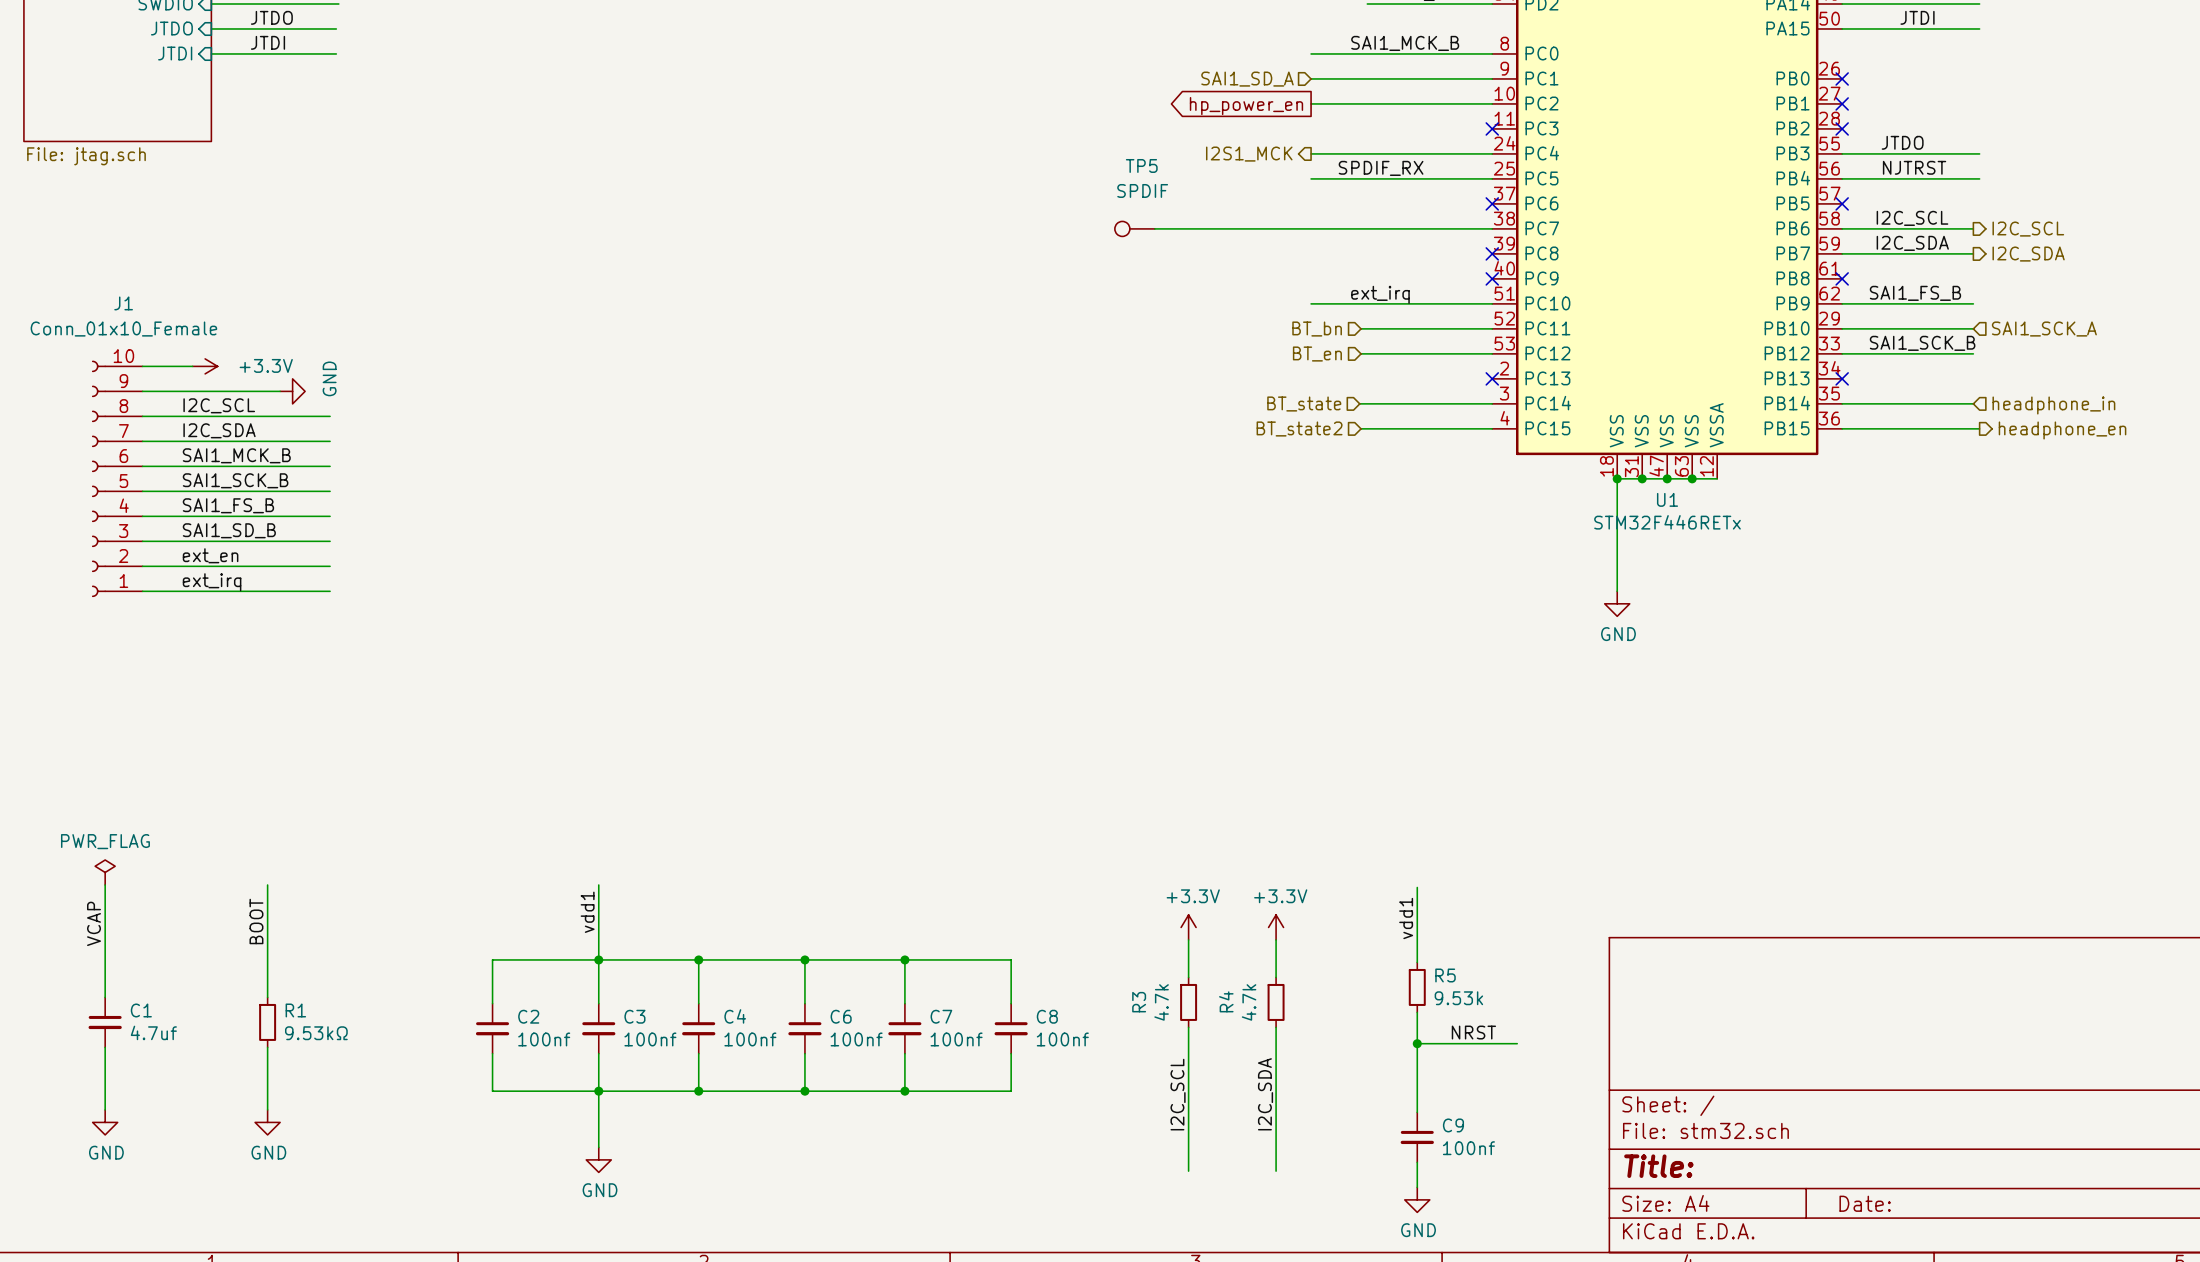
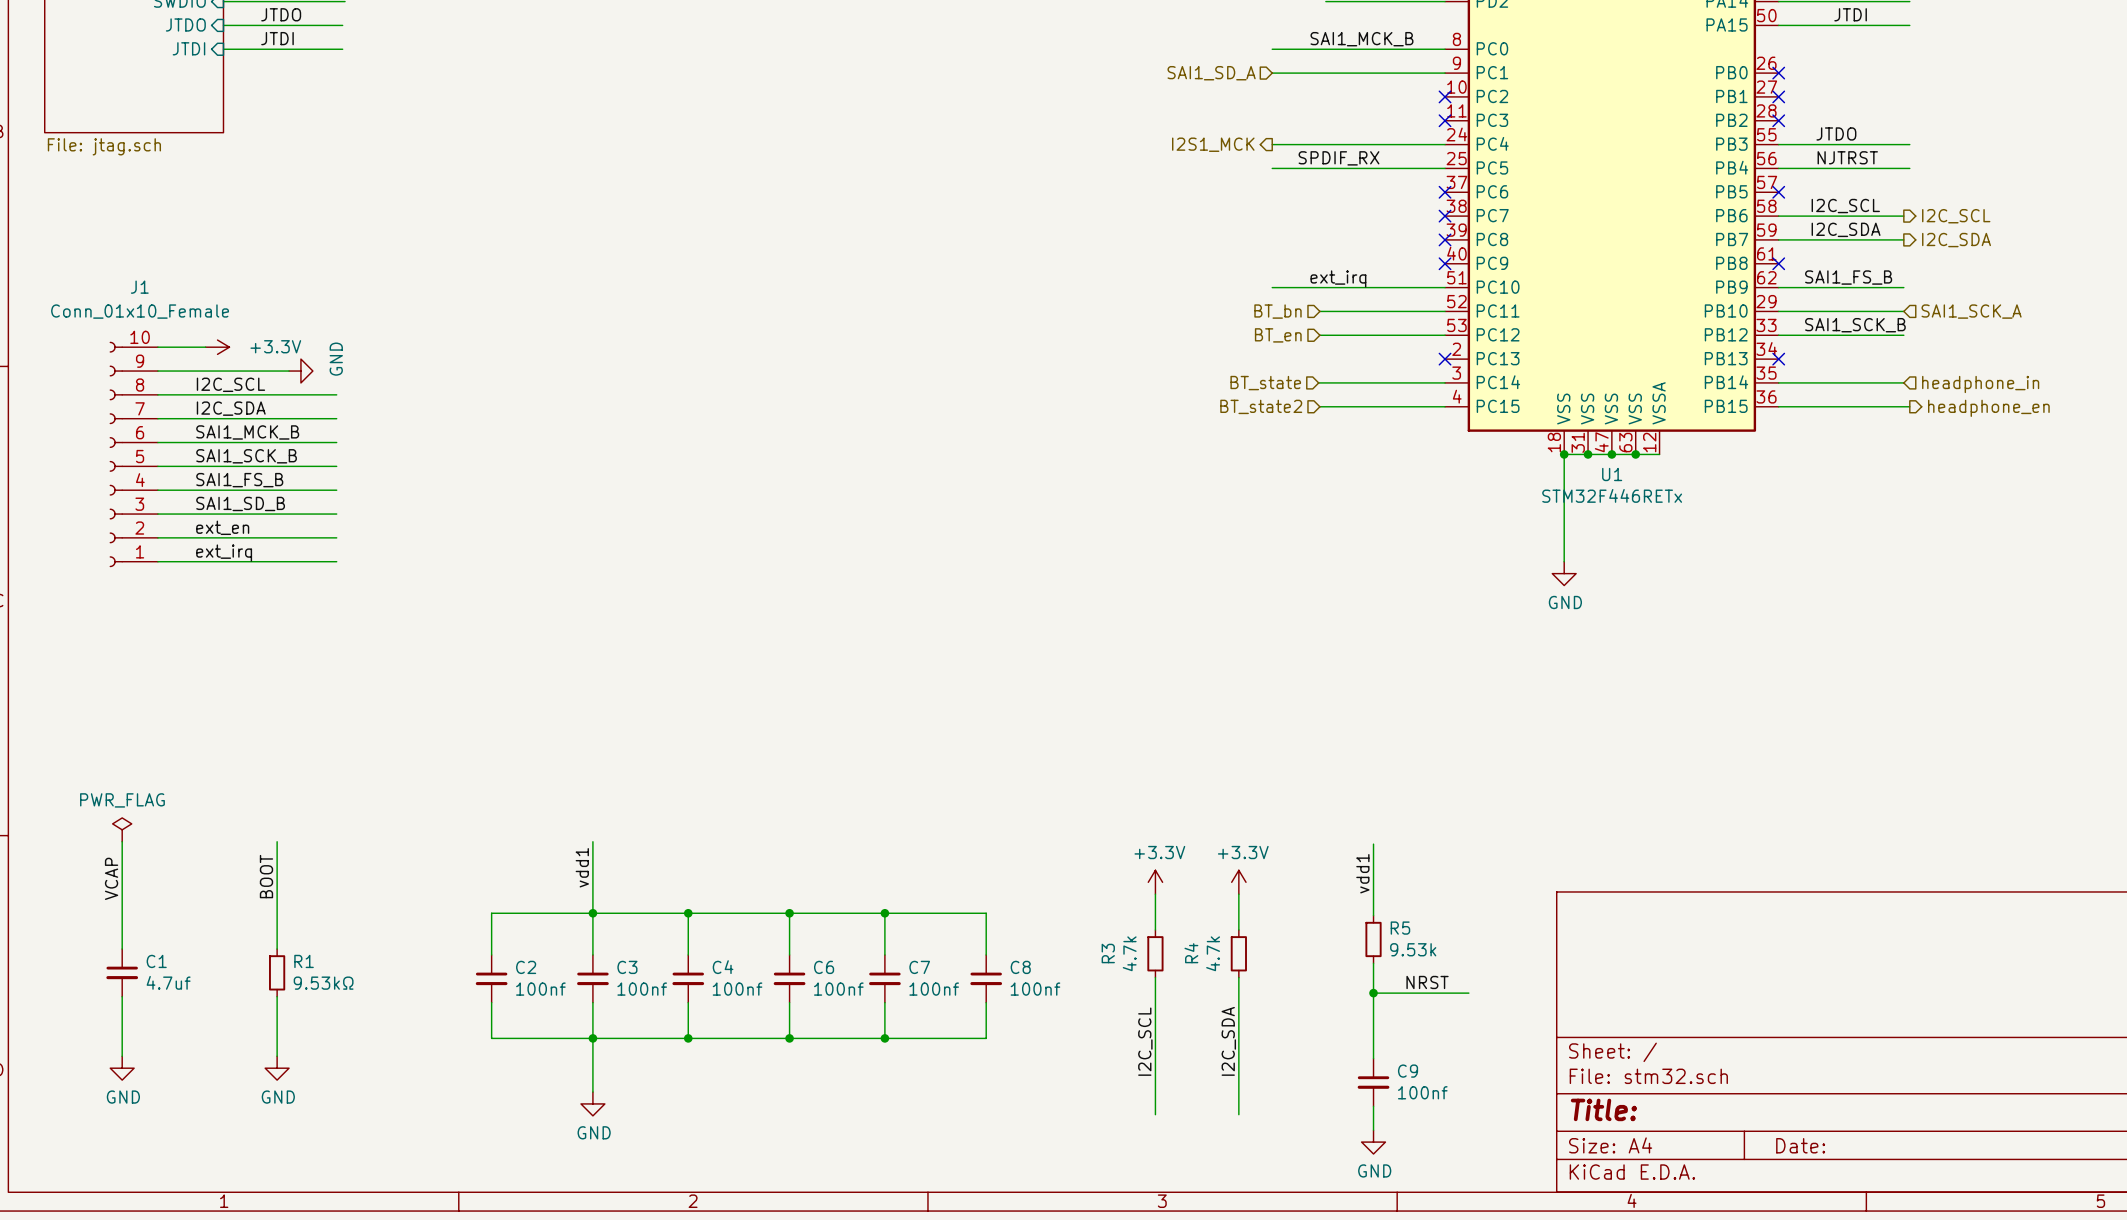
wire: (1311, 103) (1492, 103) -> none
no-connect mark: none -> (1445, 96)
global label: hp_power_en (1246, 106) -> none
TP5: SPDIF (1134, 228) -> none
wire: (1154, 228) (1492, 228) -> none
no-connect mark: none -> (1445, 216)

